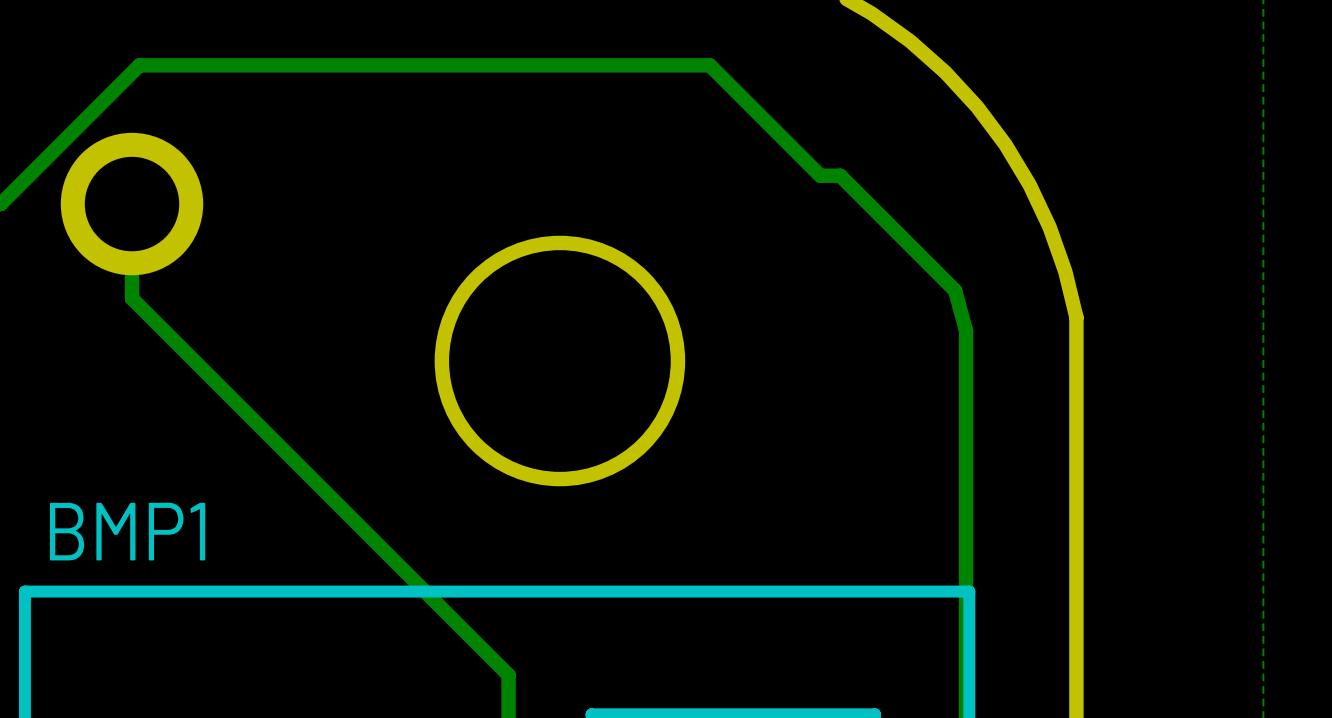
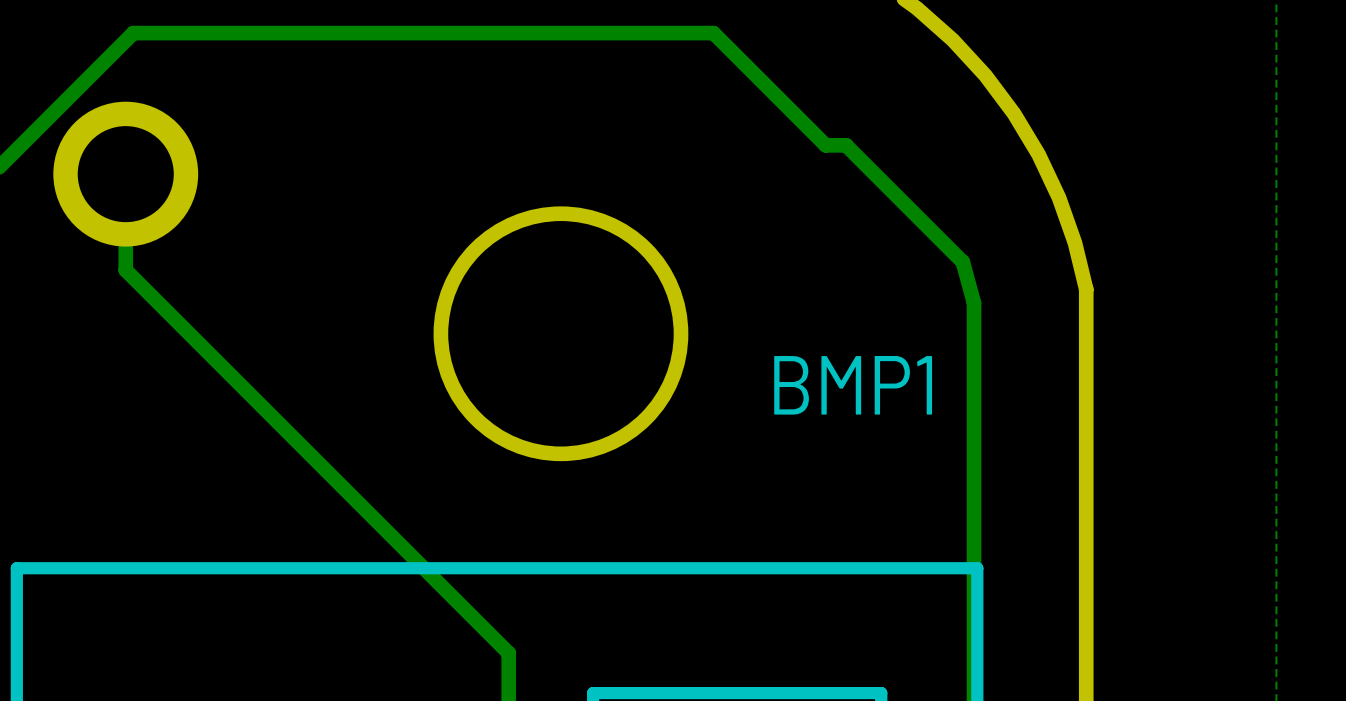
BMP1 name position: BMP1 (127, 531) -> BMP1 (853, 385)

